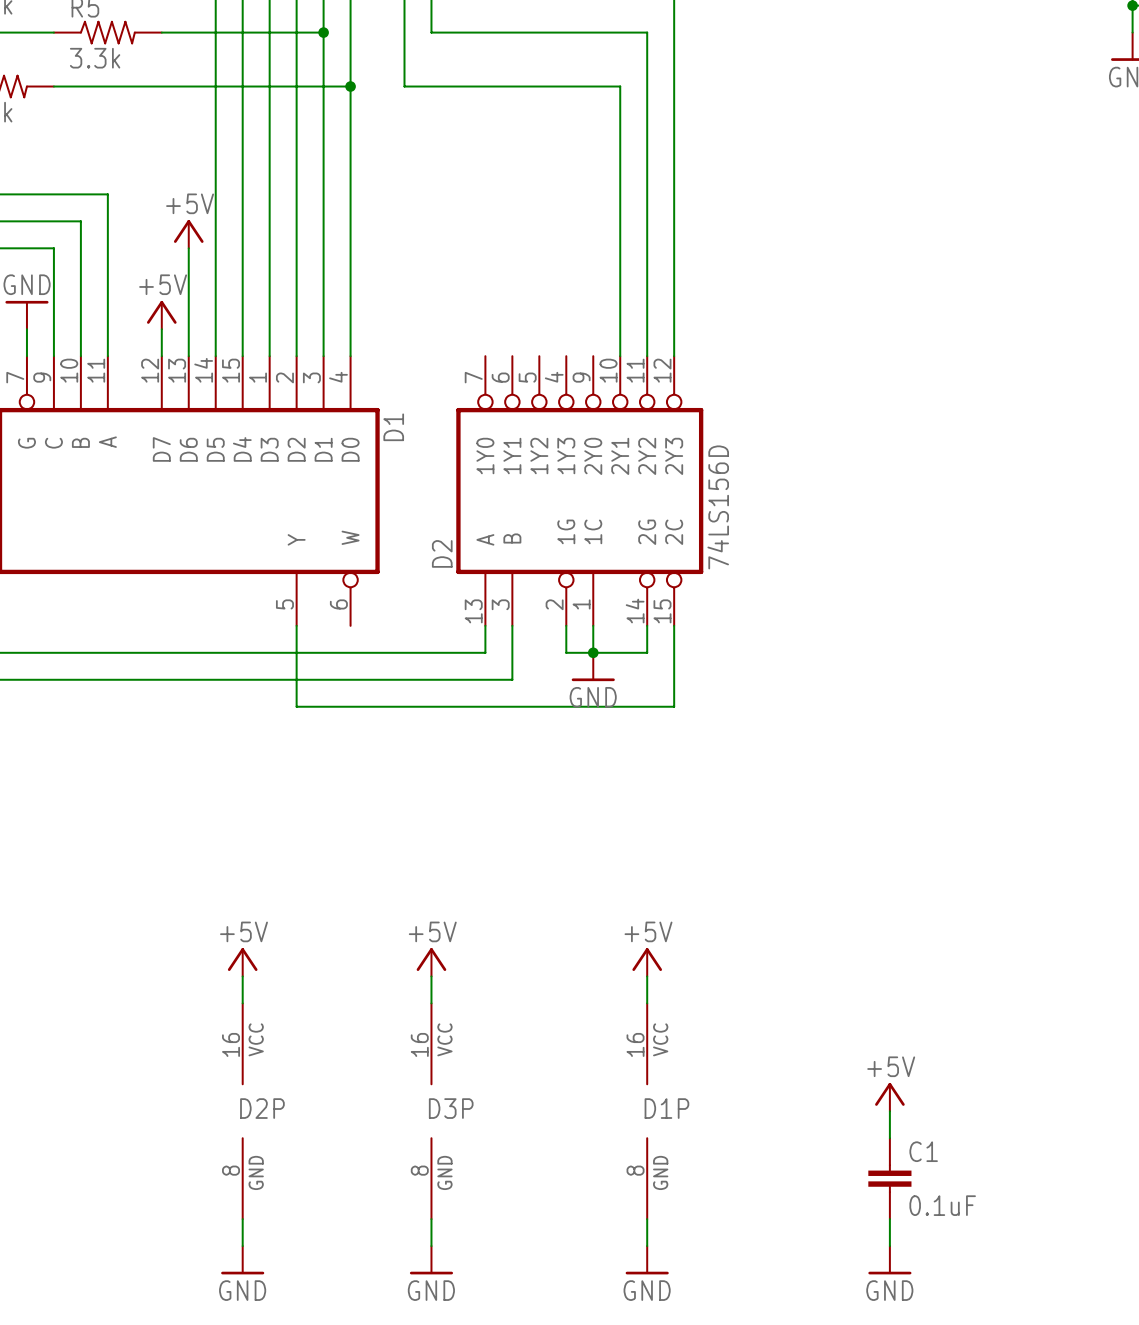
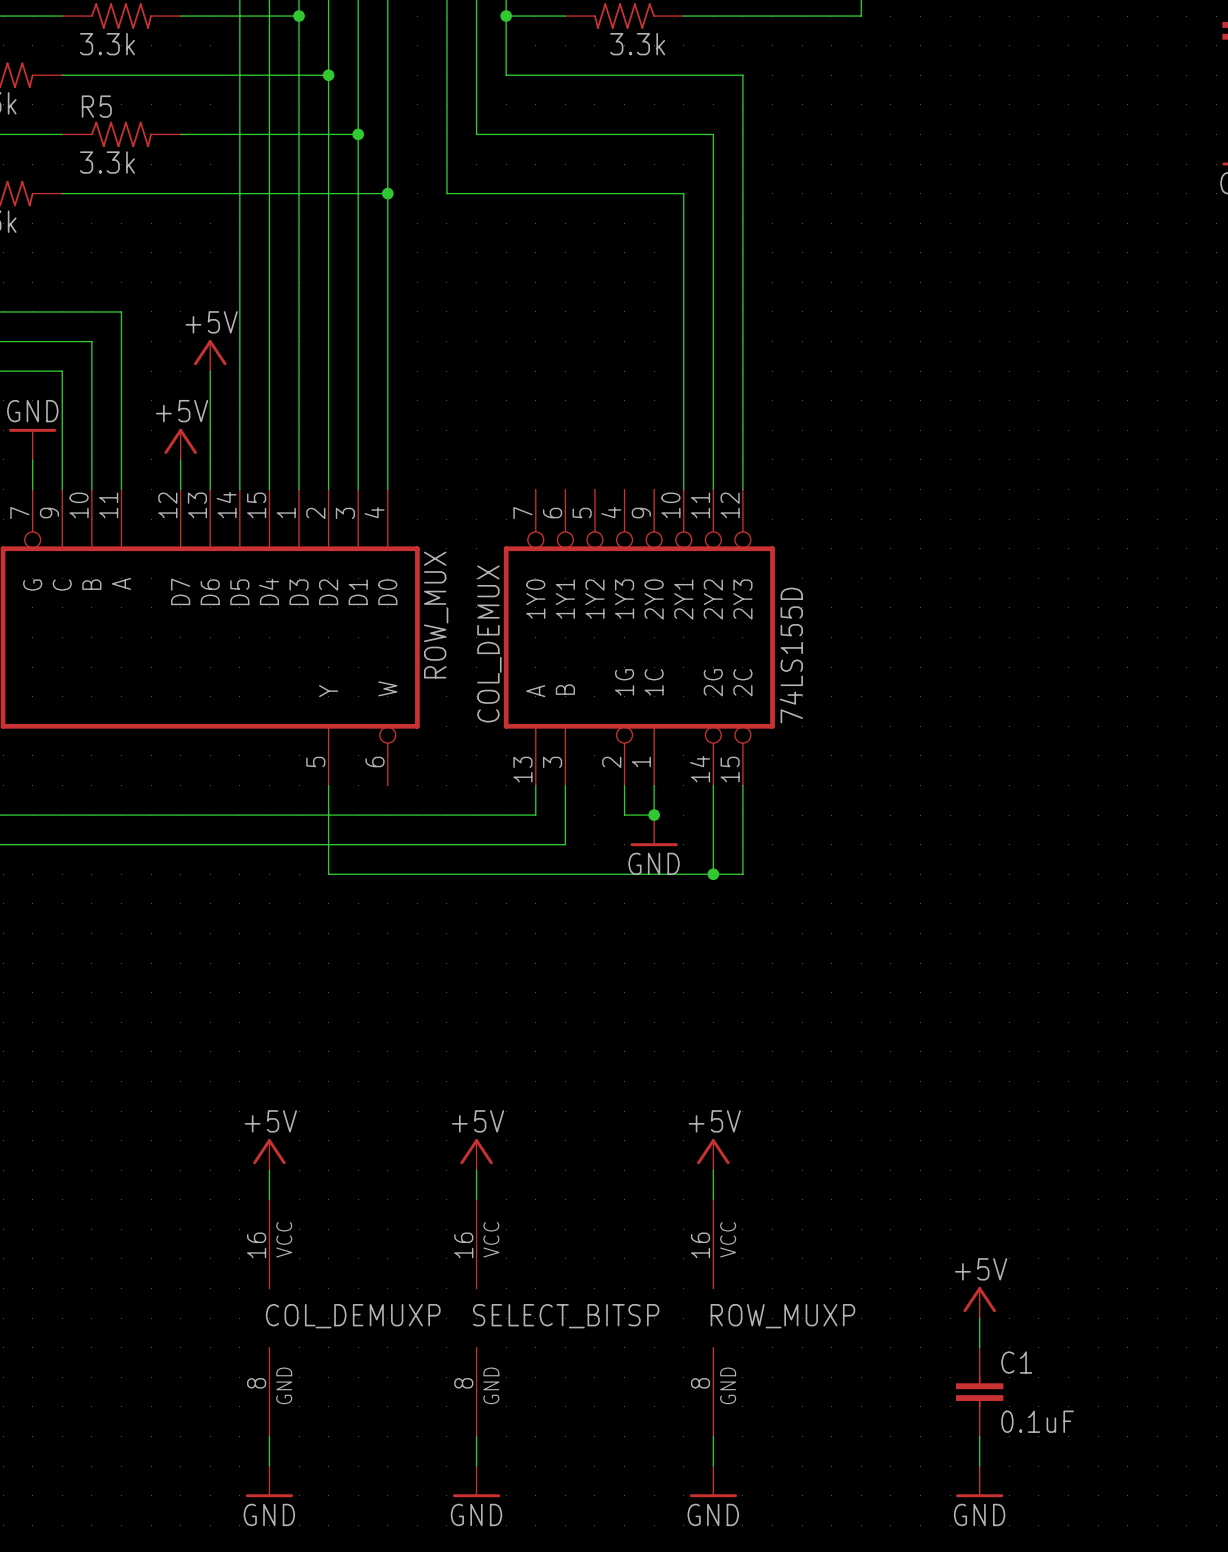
D1 name: D1 (393, 427) -> ROW_MUX (436, 615)
D2 value: 74LS156D (718, 507) -> 74LS155D (791, 655)
D2 name: D2 (442, 553) -> COL_DEMUX (489, 643)
wire: (593, 652) (647, 652) -> (713, 874) (713, 815)
junction: none -> (713, 874)
D2P name: D2P (262, 1108) -> COL_DEMUXP (353, 1316)
D3P name: D3P (451, 1108) -> SELECT_BITSP (566, 1316)
D1P name: D1P (666, 1108) -> ROW_MUXP (782, 1316)

